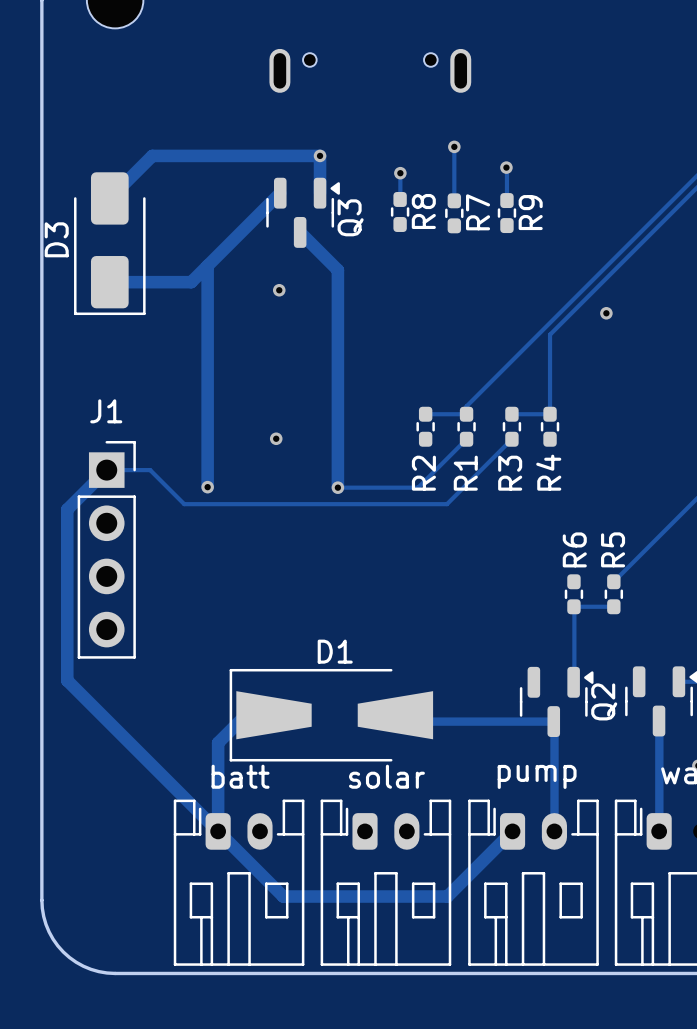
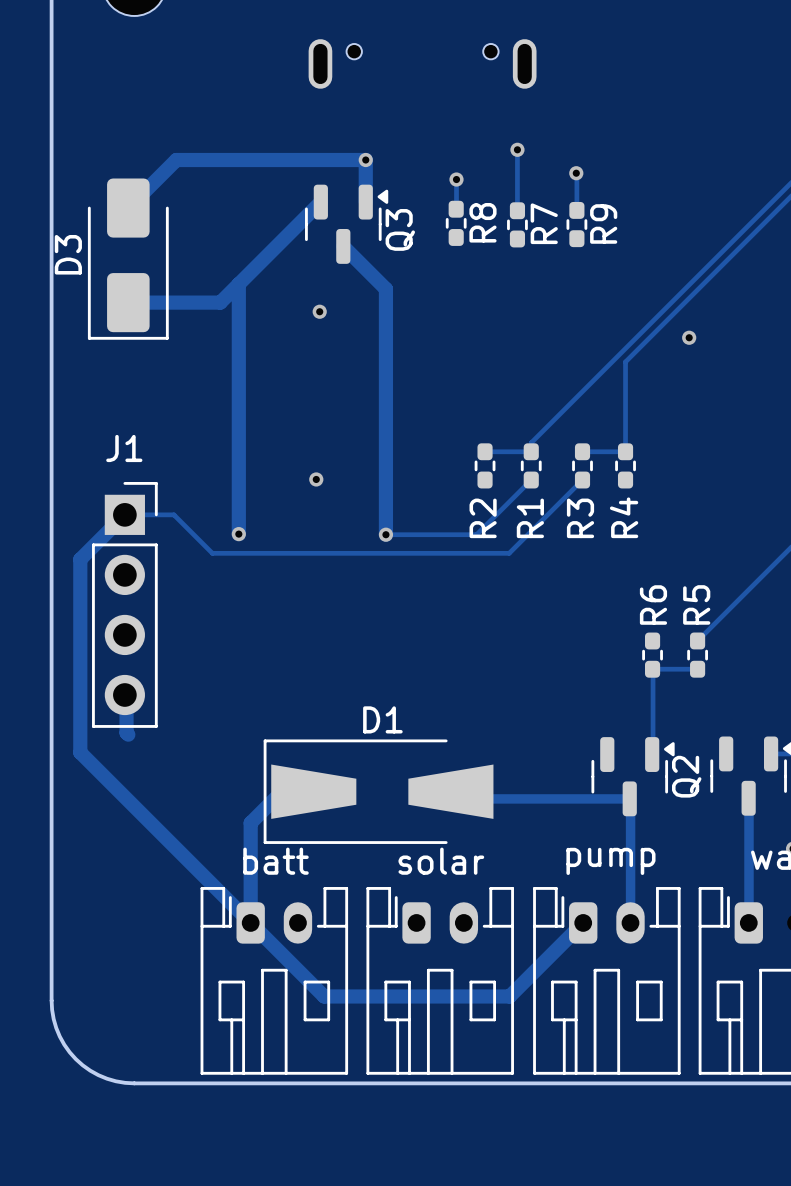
track: none -> (124, 695) (126, 696) (126, 732) (128, 734)

